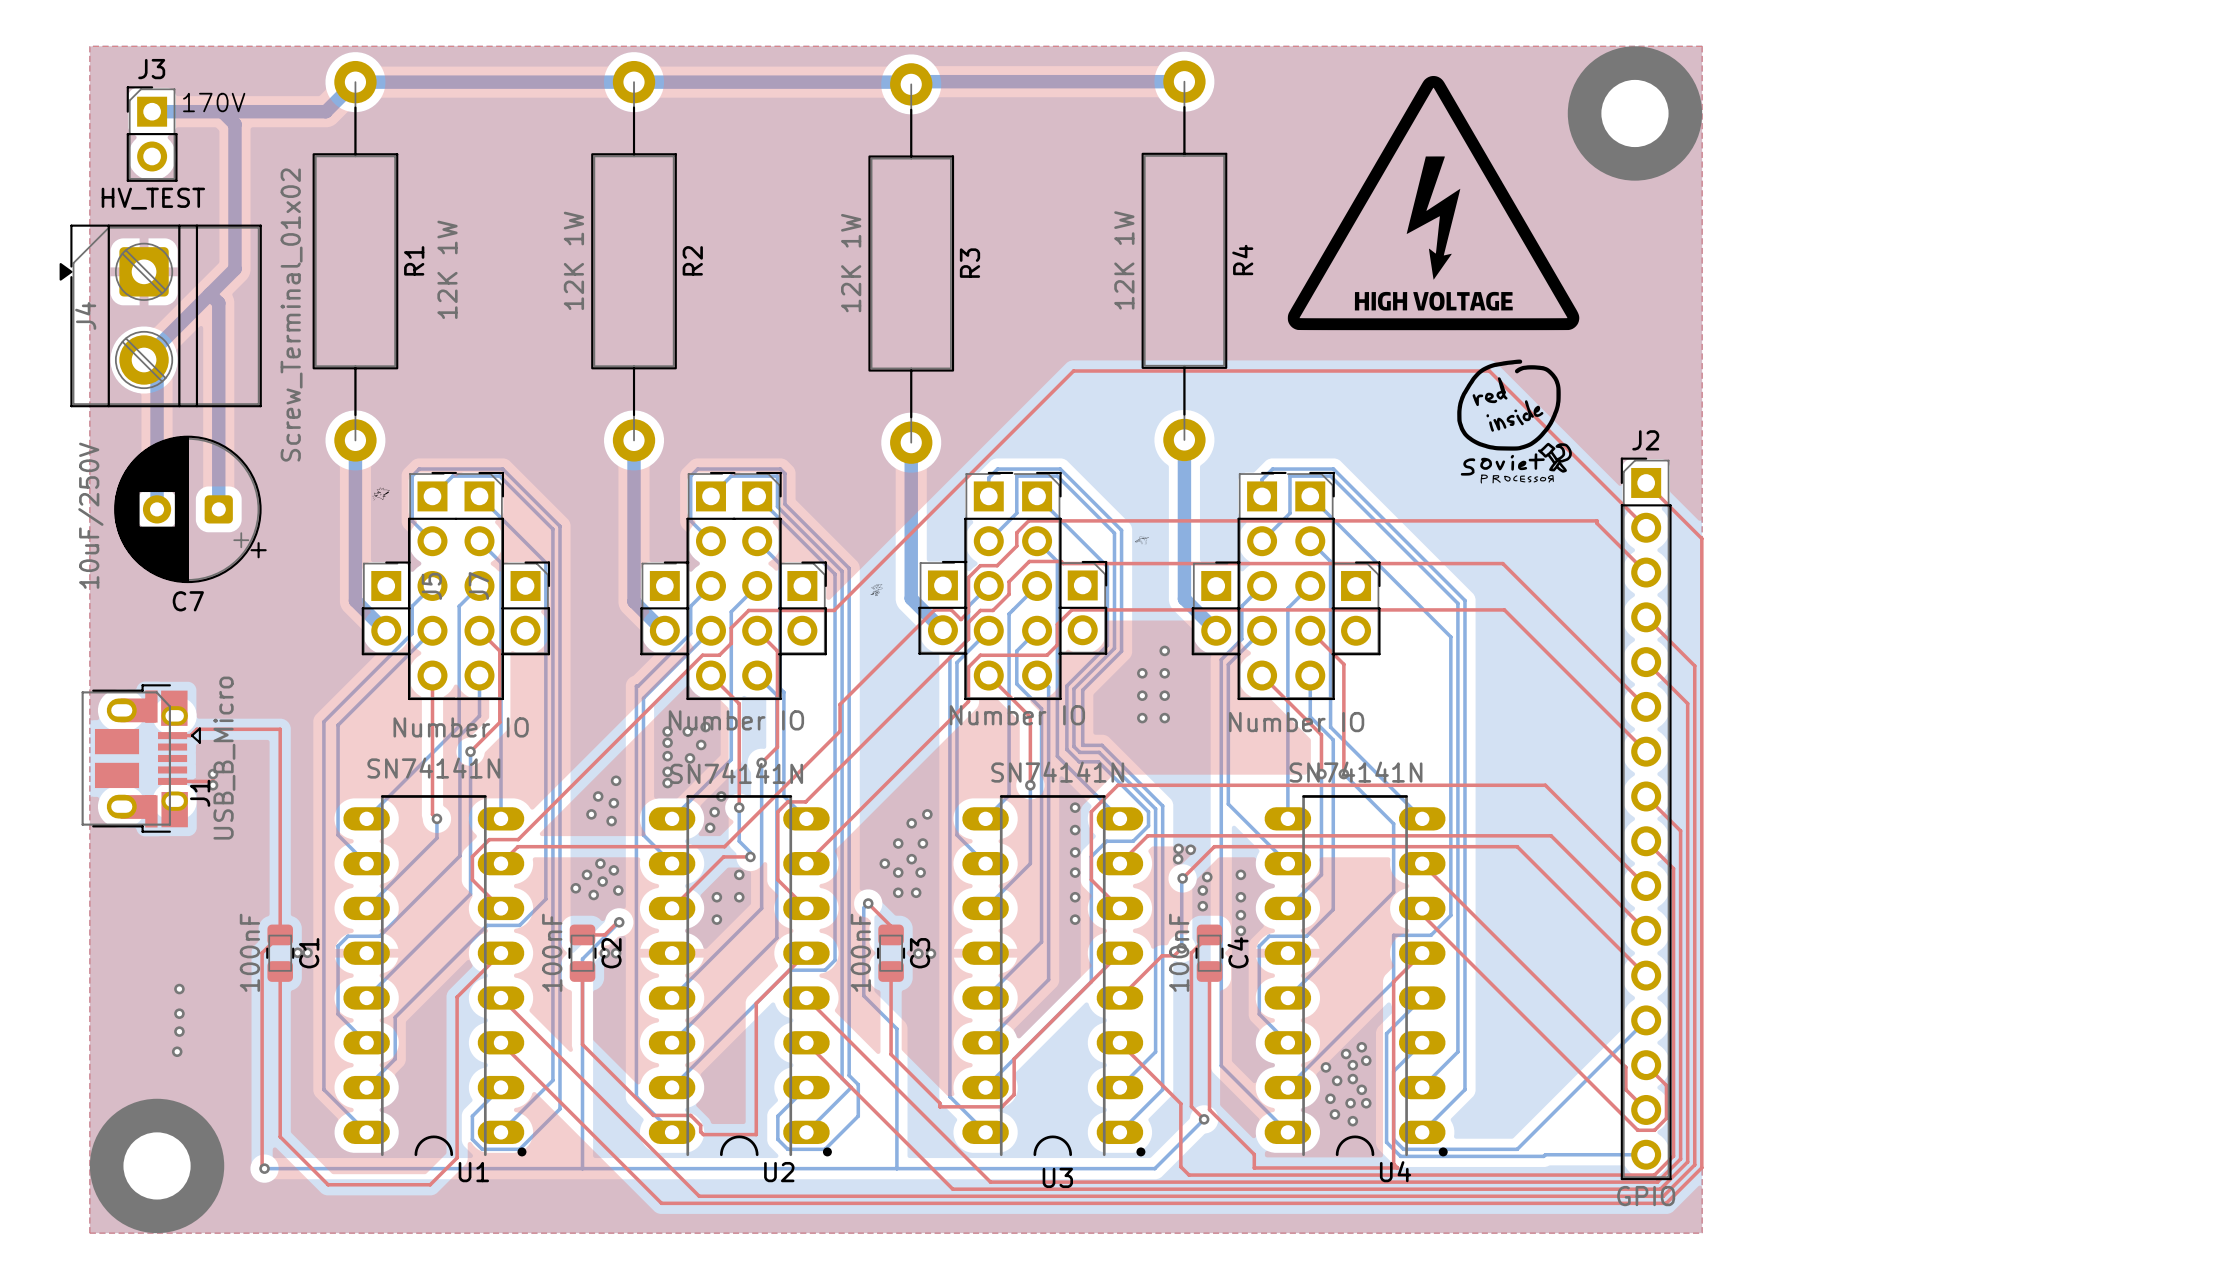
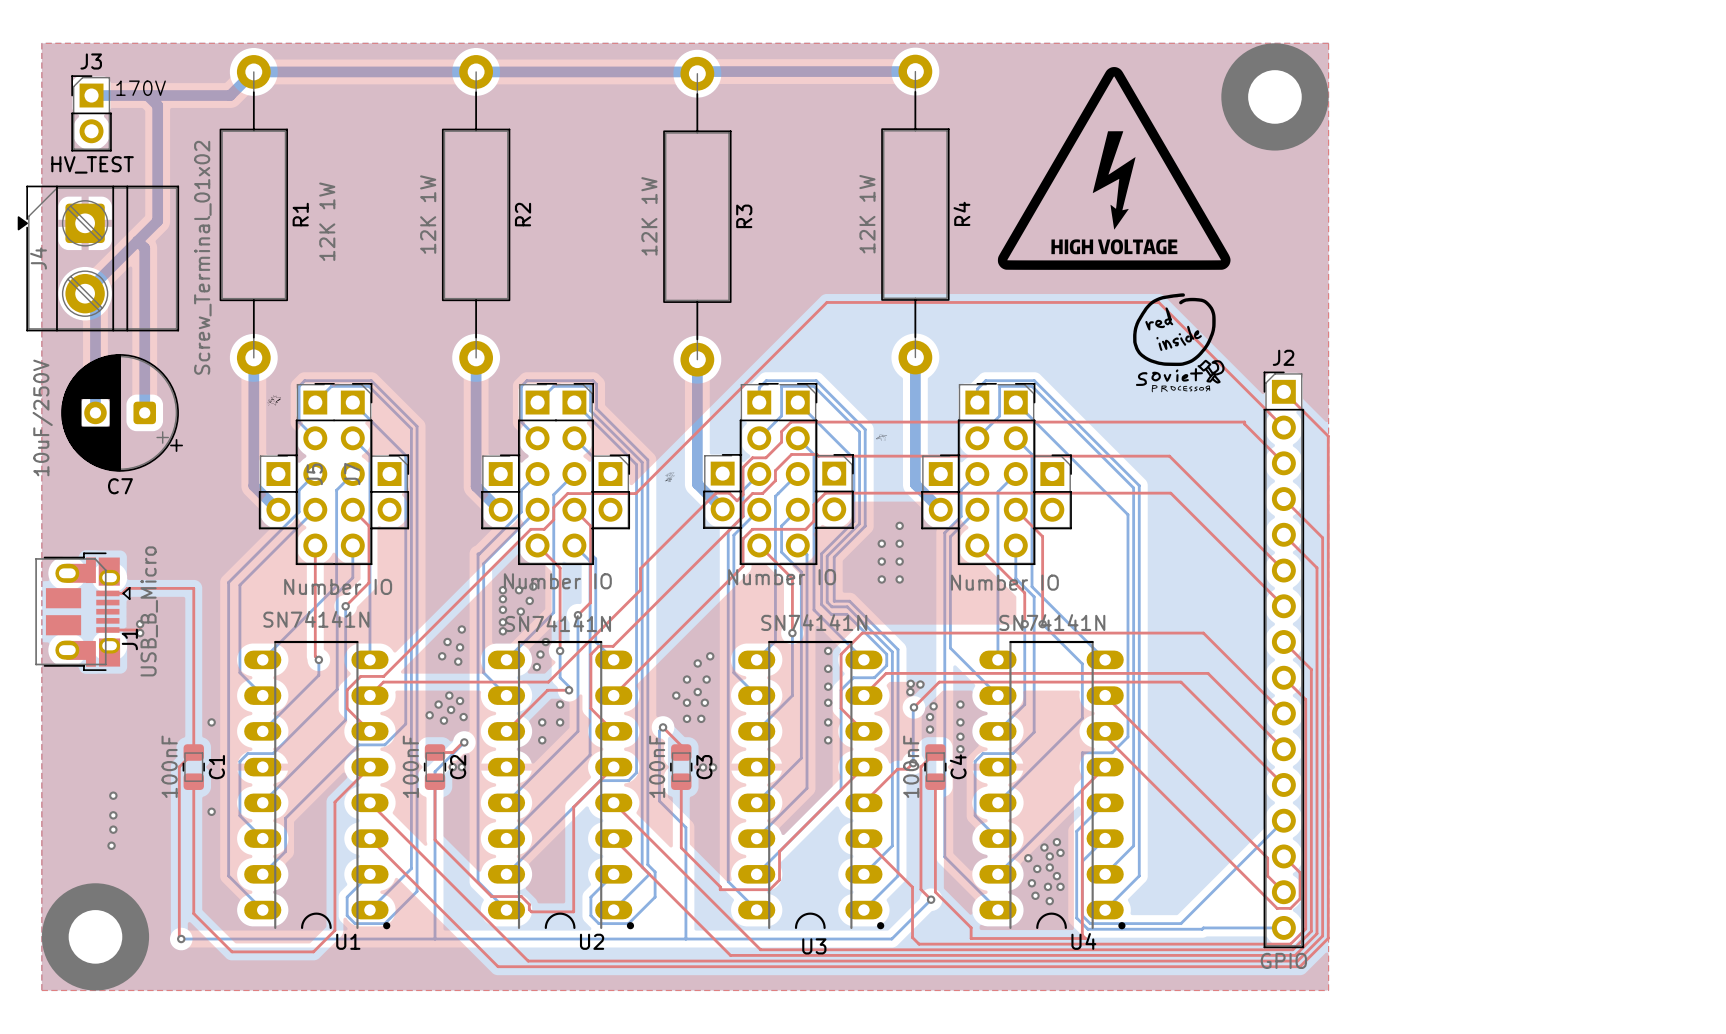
via: none -> (211, 722)
via: (297, 952) -> none
via: (307, 952) -> none
via: none -> (211, 811)

